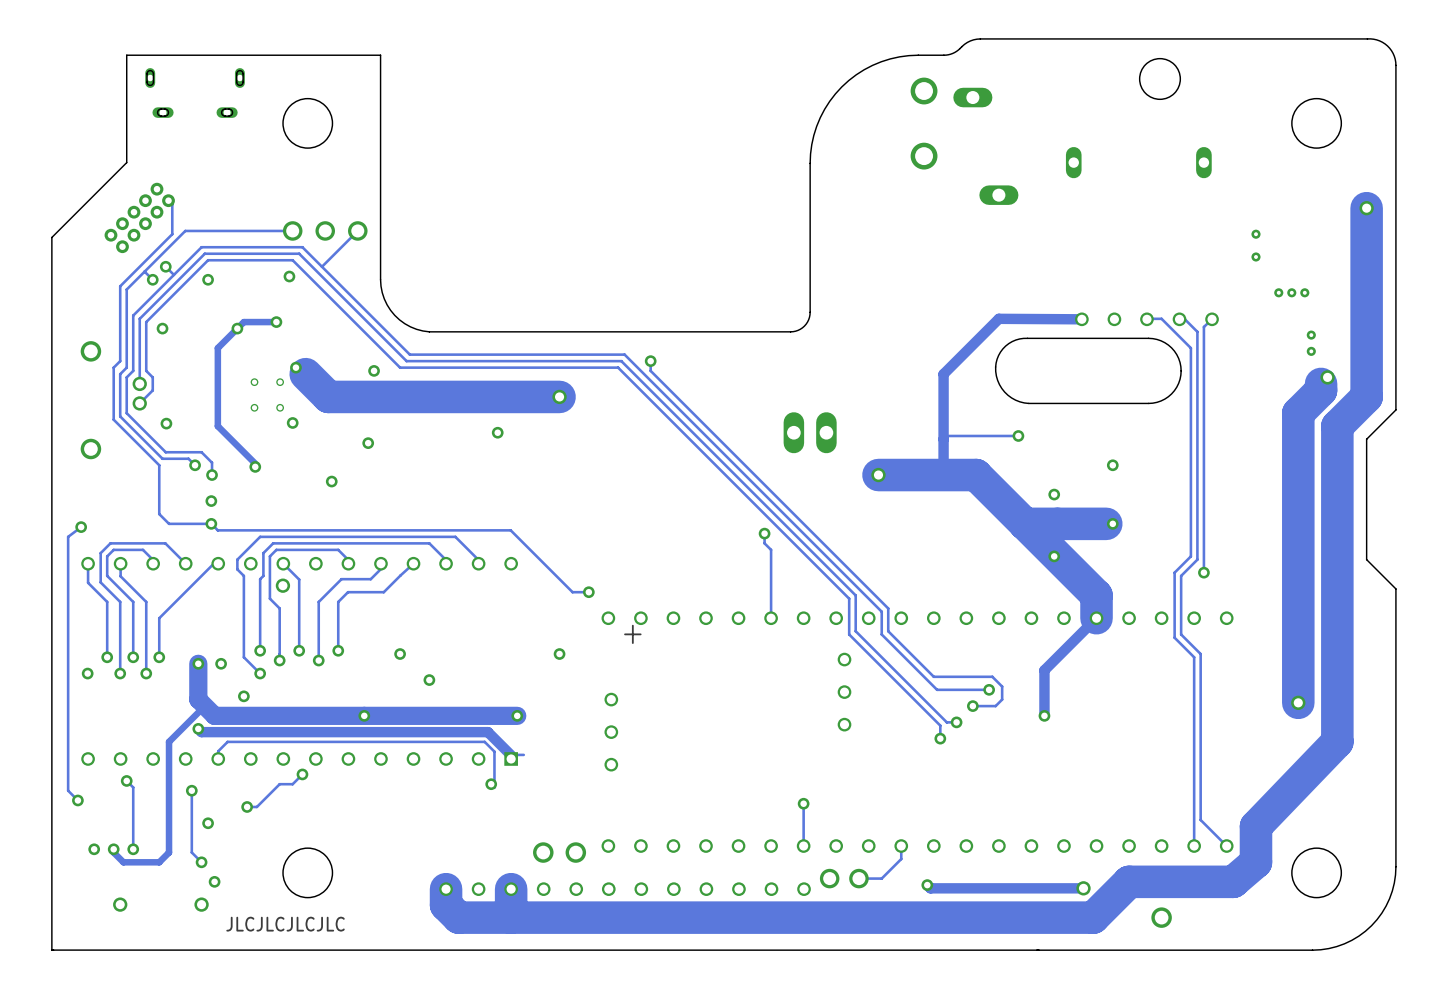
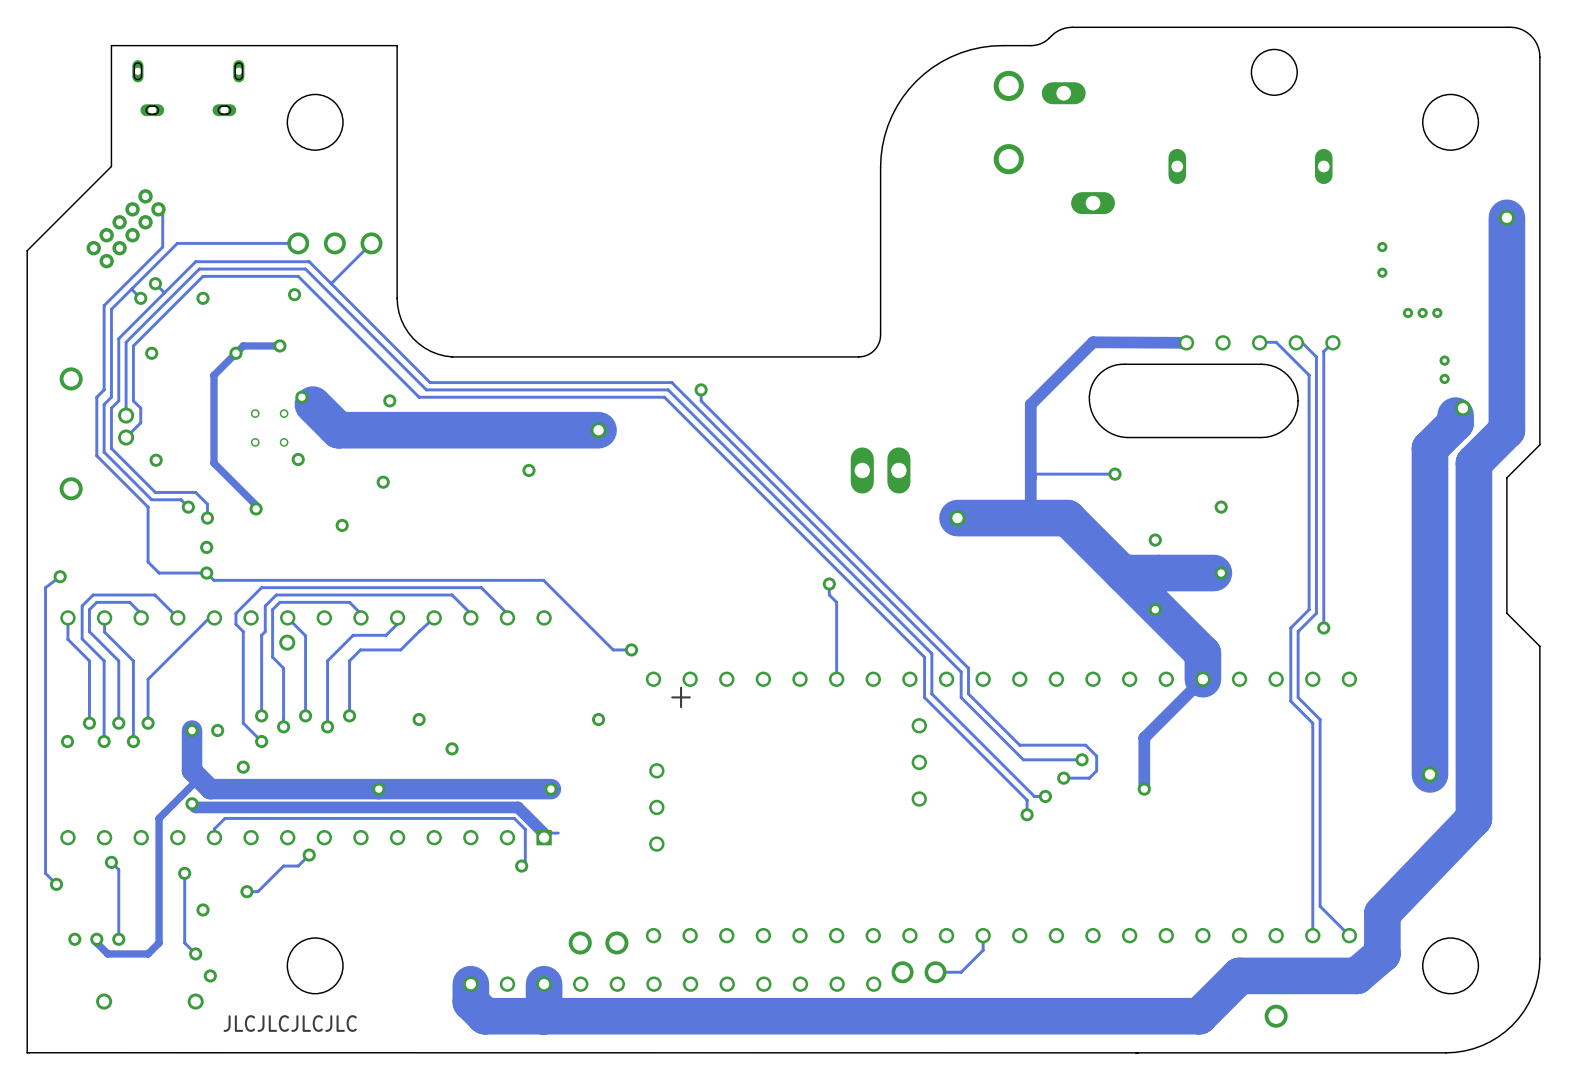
track: (803, 803) (803, 846) -> none
via: (803, 803) -> none
track: (927, 885) (930, 888) (1083, 888) -> none
via: (927, 885) -> none
via: (1083, 888) -> none

